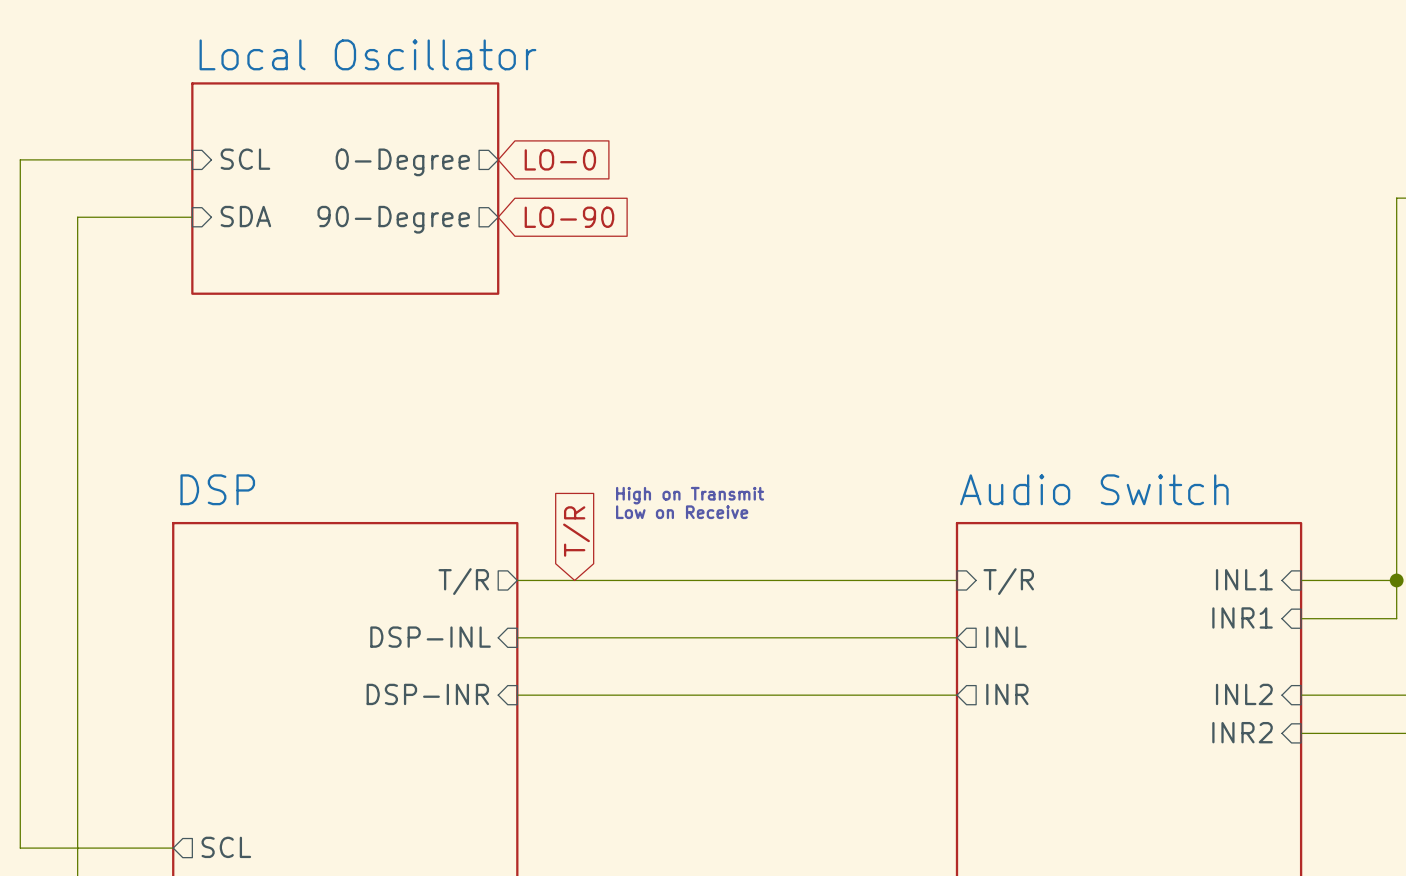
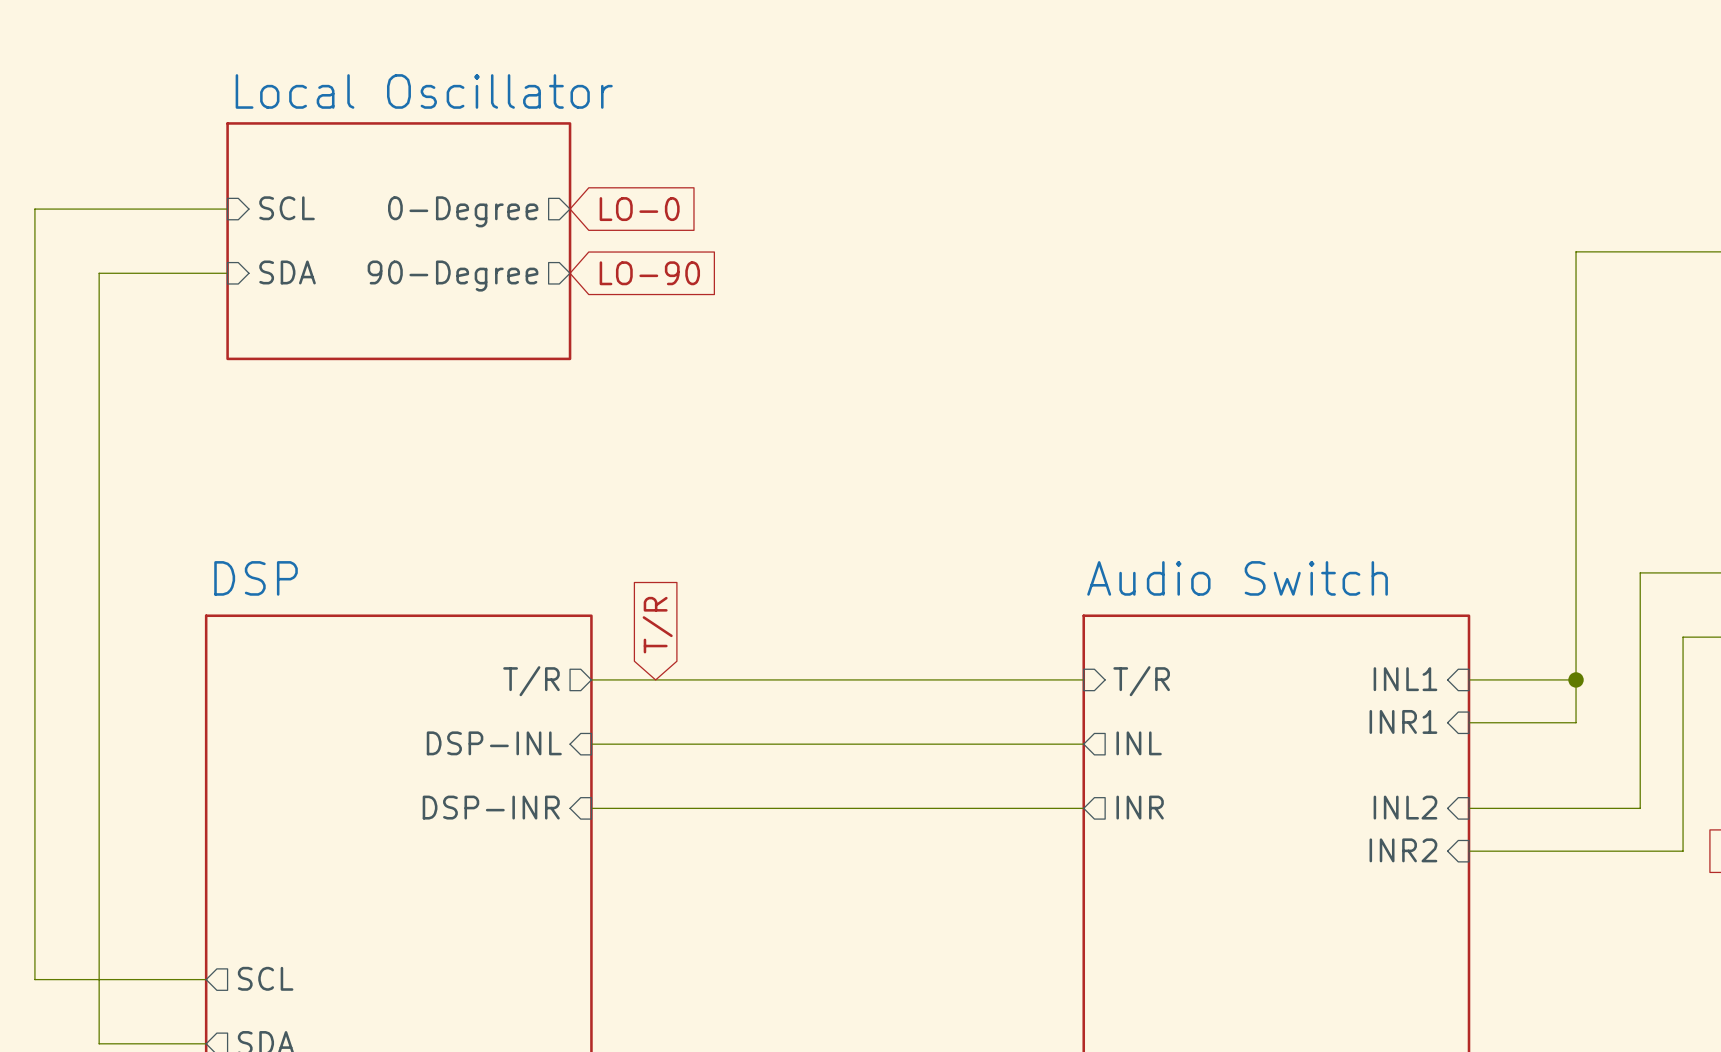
text: High on Transmit (690, 495) -> none
text: Low on Receive (682, 512) -> none

